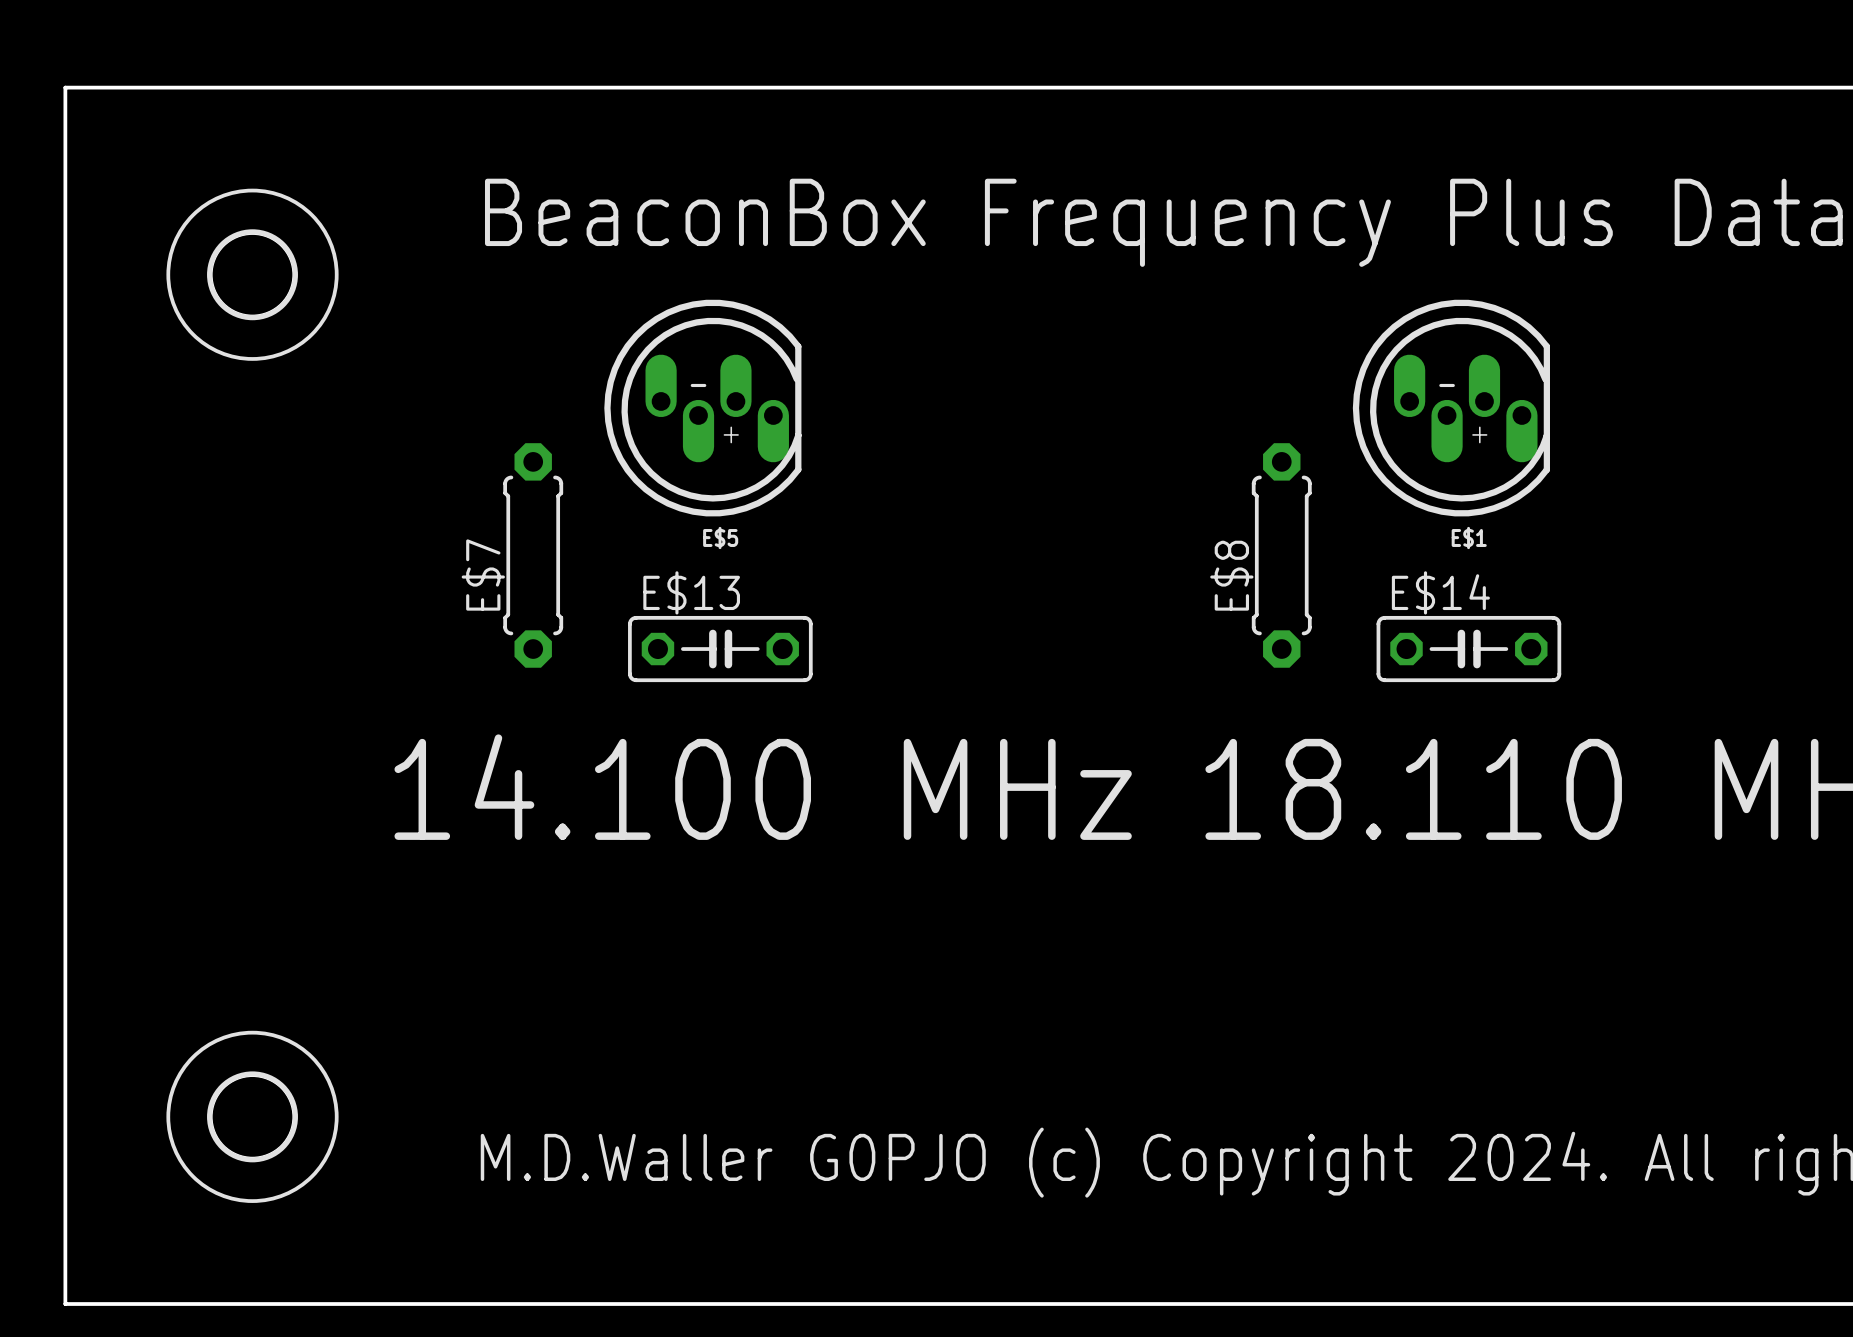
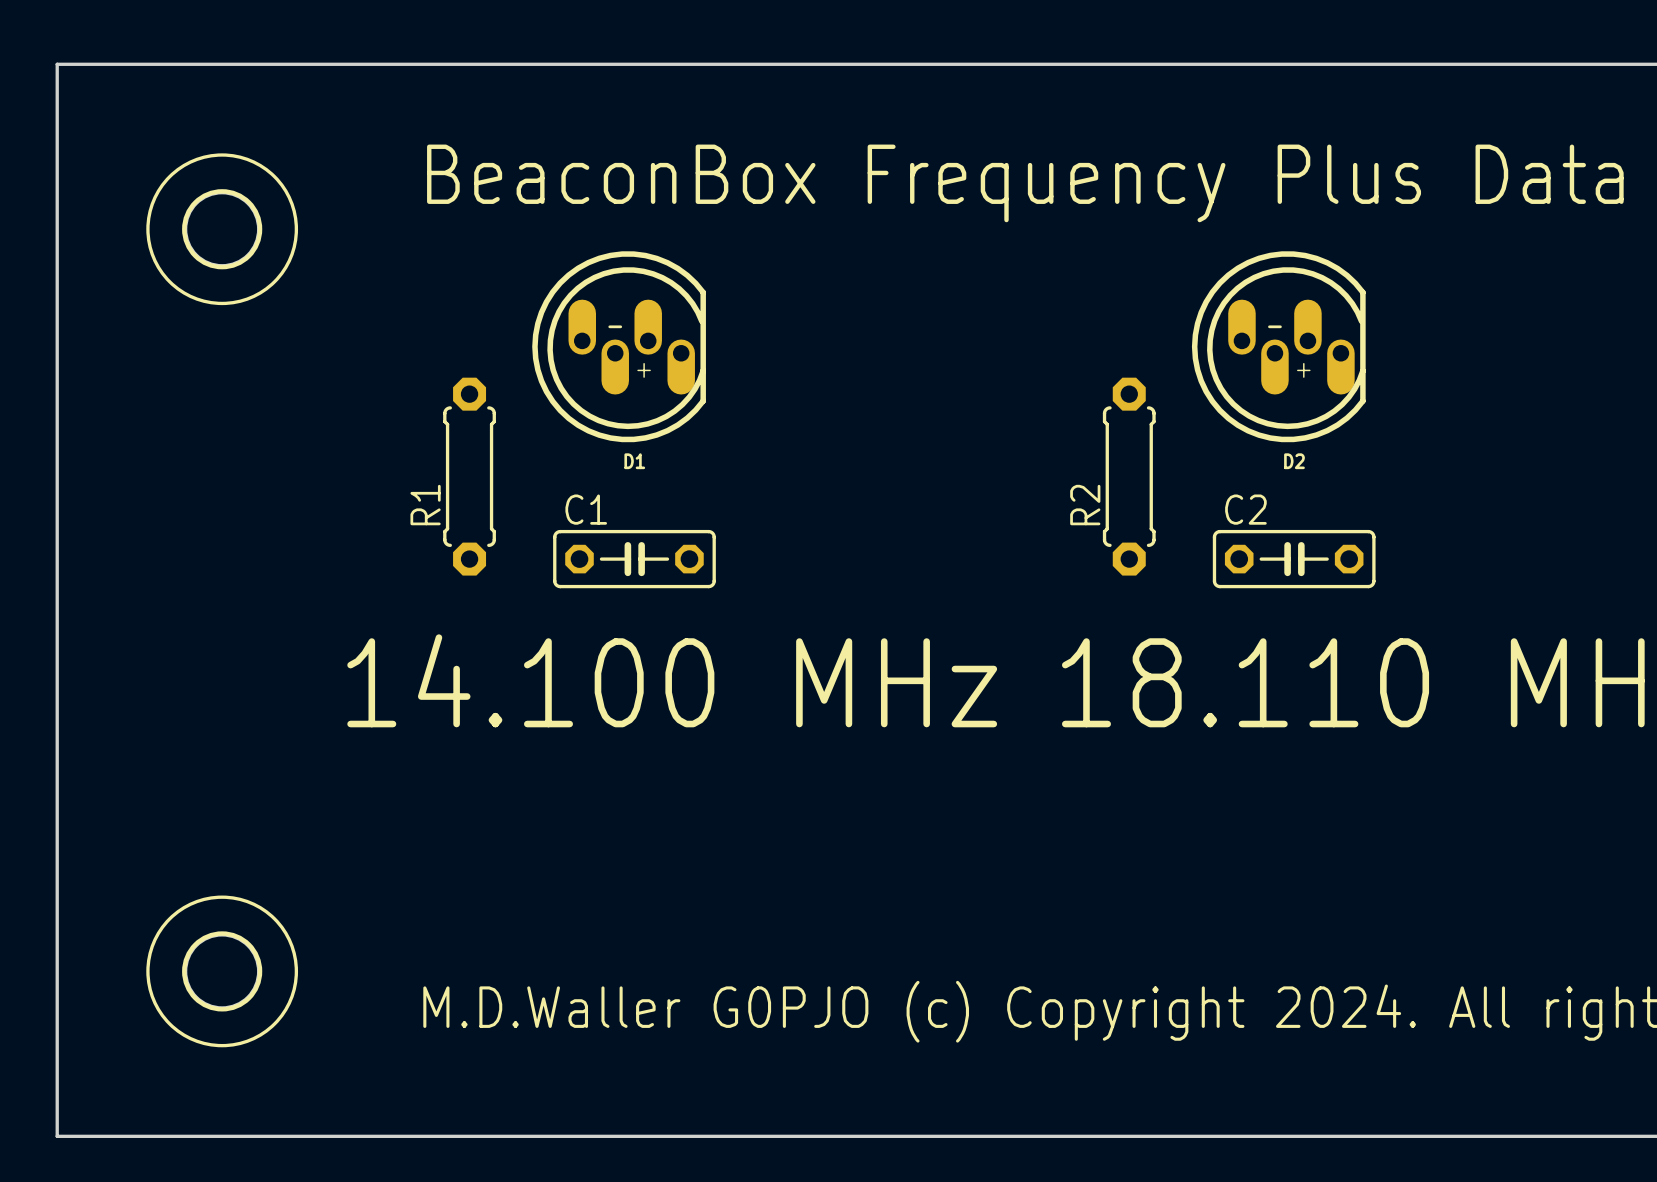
E$5 name: E$5 (720, 537) -> D1 (634, 461)
E$1 name: E$1 (1469, 537) -> D2 (1294, 461)
E$7 name: E$7 (483, 575) -> R1 (425, 505)
E$8 name: E$8 (1231, 575) -> R2 (1085, 505)
E$13 name: E$13 (691, 592) -> C1 (586, 509)
E$14 name: E$14 (1440, 592) -> C2 (1245, 509)

